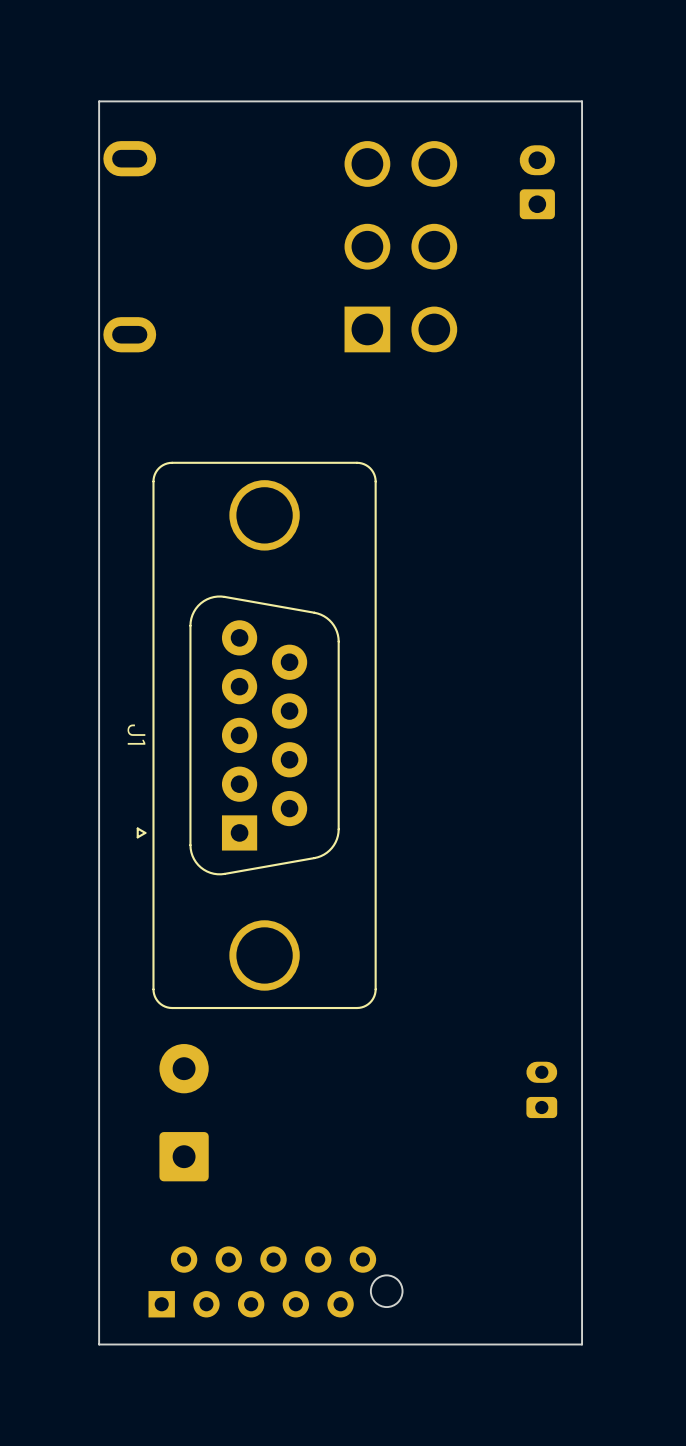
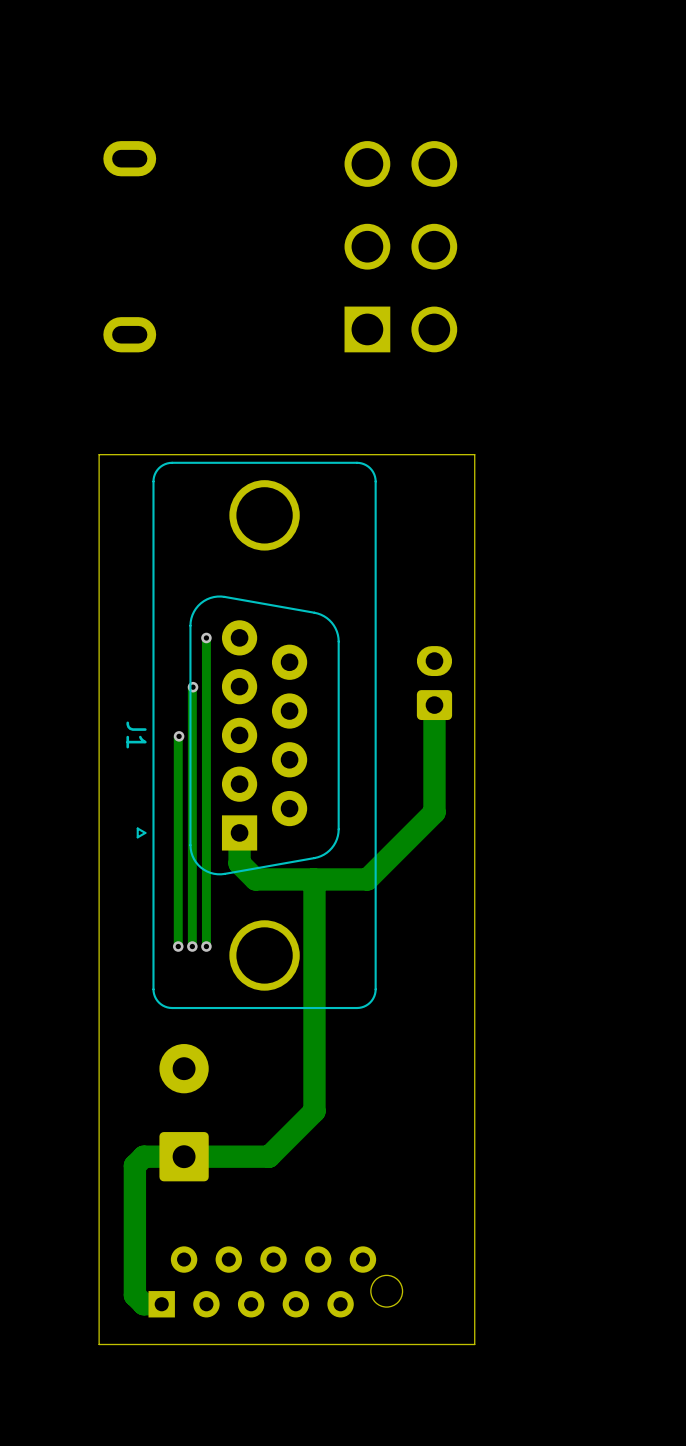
part: (537, 182) -> none
board edge: (99, 454) (99, 101) (582, 101) (582, 1344) (474, 1344) -> (99, 454) (474, 454) (474, 1344)
track: none -> (206, 637) (206, 946)
via: none -> (206, 637)
part: none -> (434, 683)
track: none -> (193, 687) (192, 946)
via: none -> (193, 687)
track: none -> (434, 705) (434, 812) (367, 879) (255, 879) (239, 863) (239, 832)
track: none -> (179, 736) (178, 946)
via: none -> (179, 736)
track: none -> (313, 879) (314, 1111) (269, 1156) (143, 1156) (134, 1165) (134, 1295) (143, 1304) (161, 1304)
via: none -> (178, 946)
via: none -> (192, 946)
via: none -> (206, 946)
part: (541, 1089) -> none

